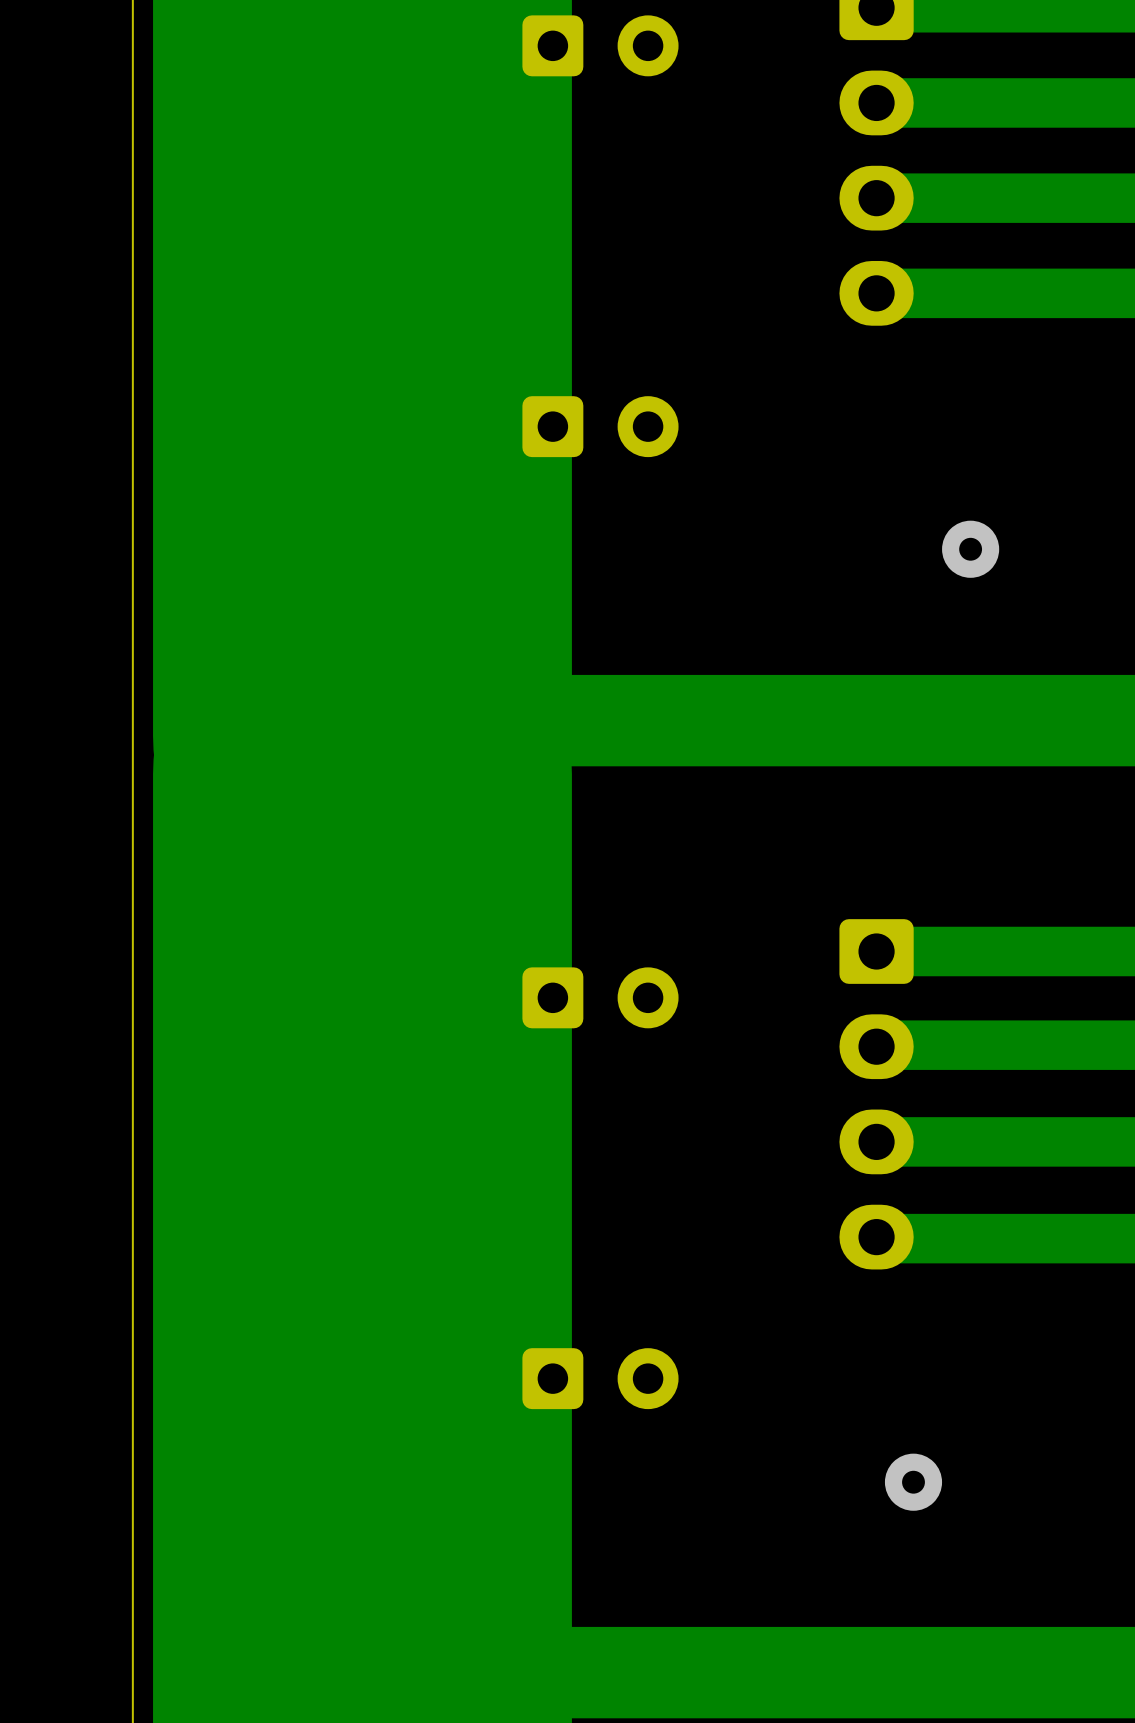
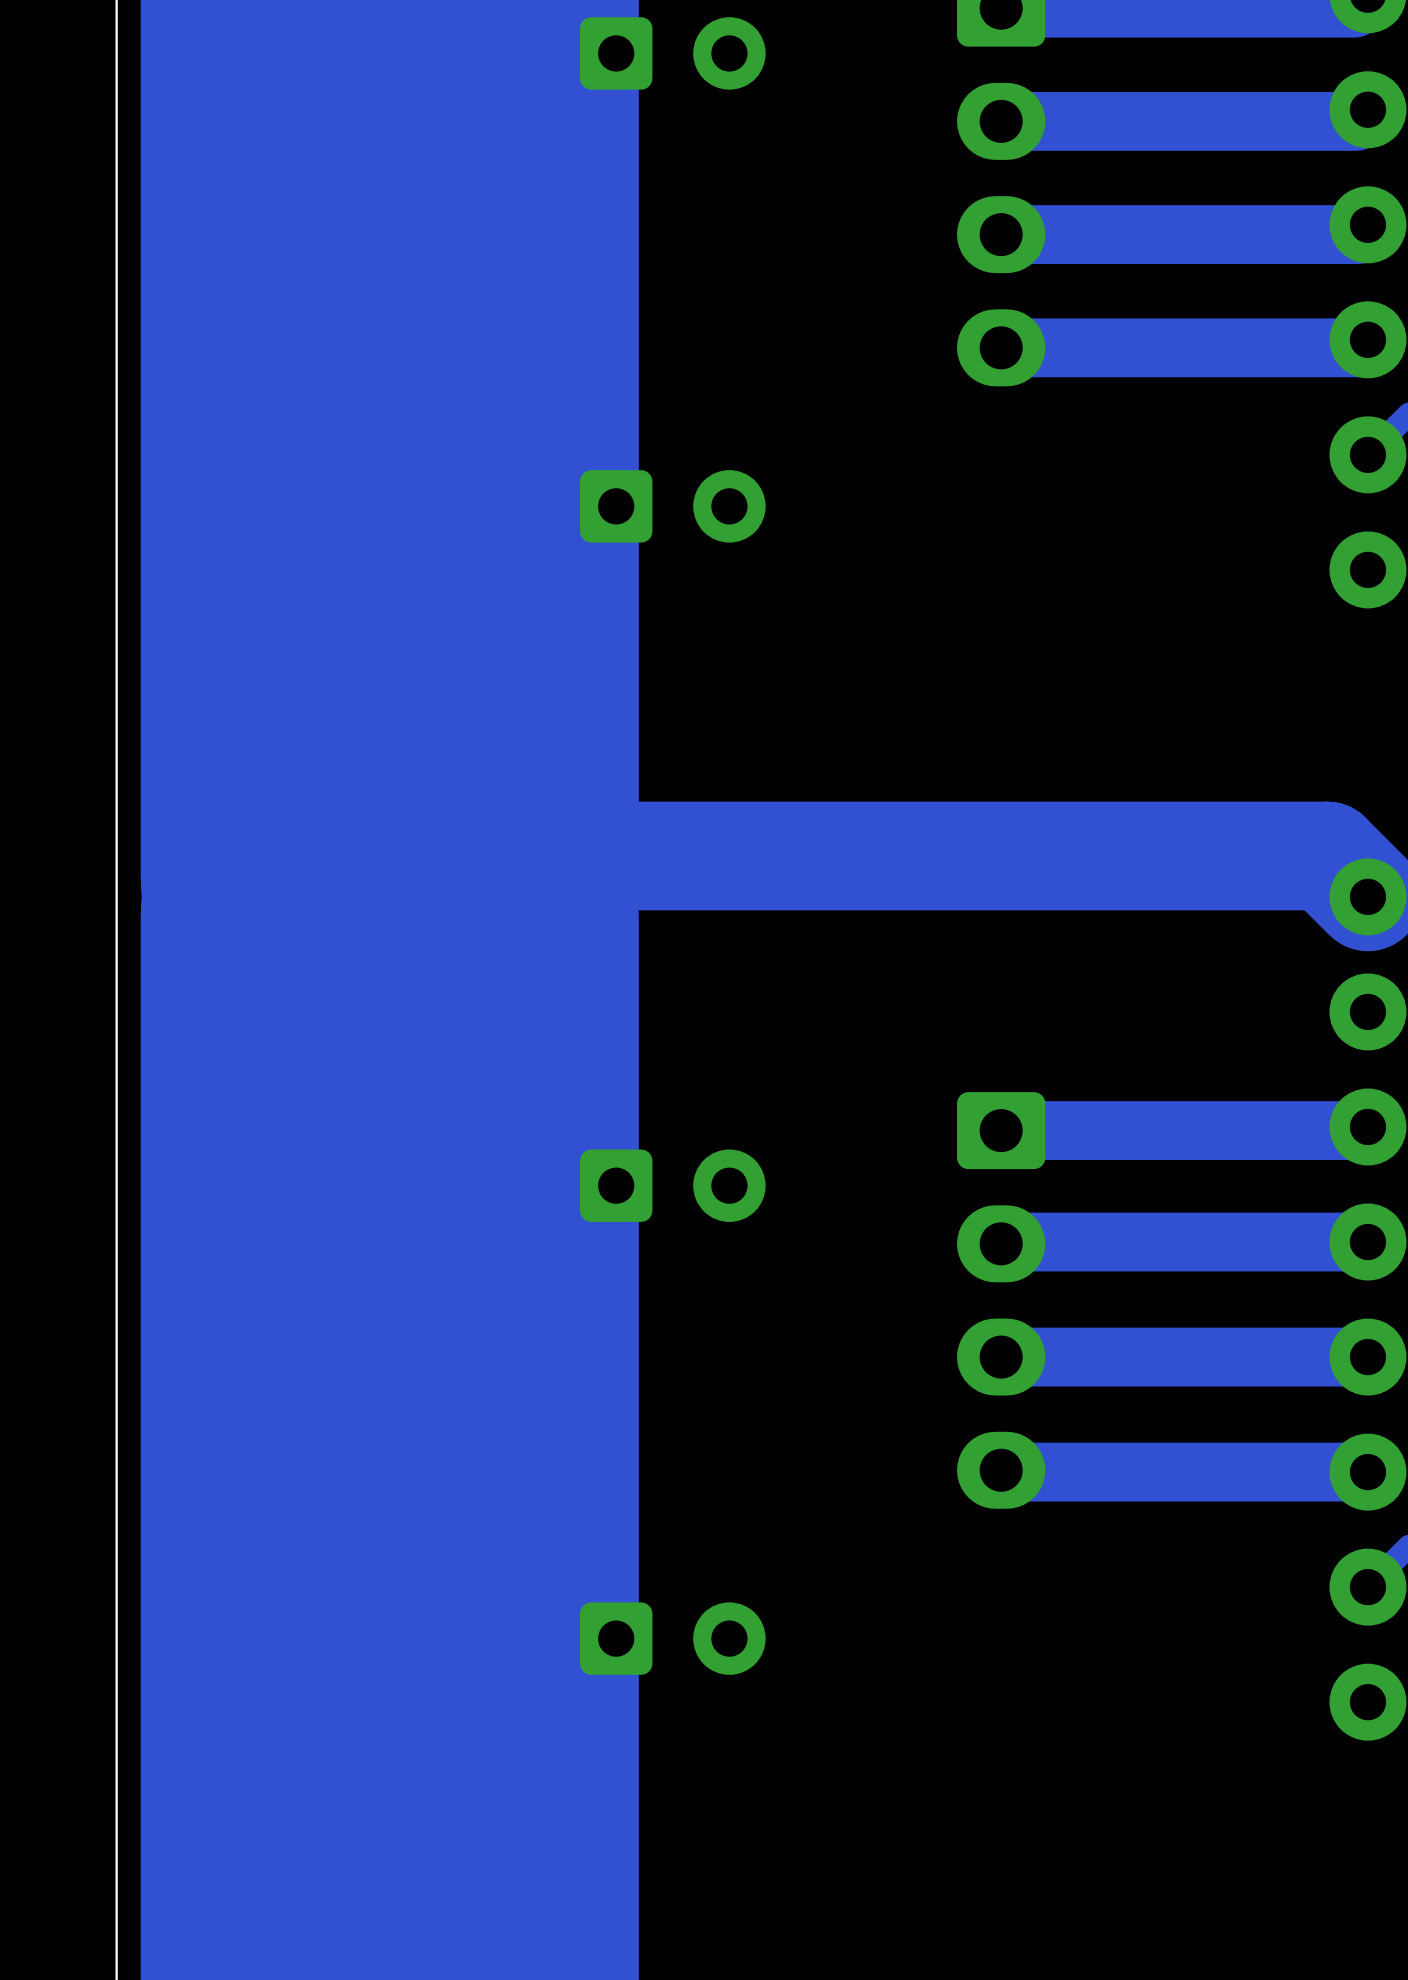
via: (970, 549) -> none
via: (913, 1482) -> none

